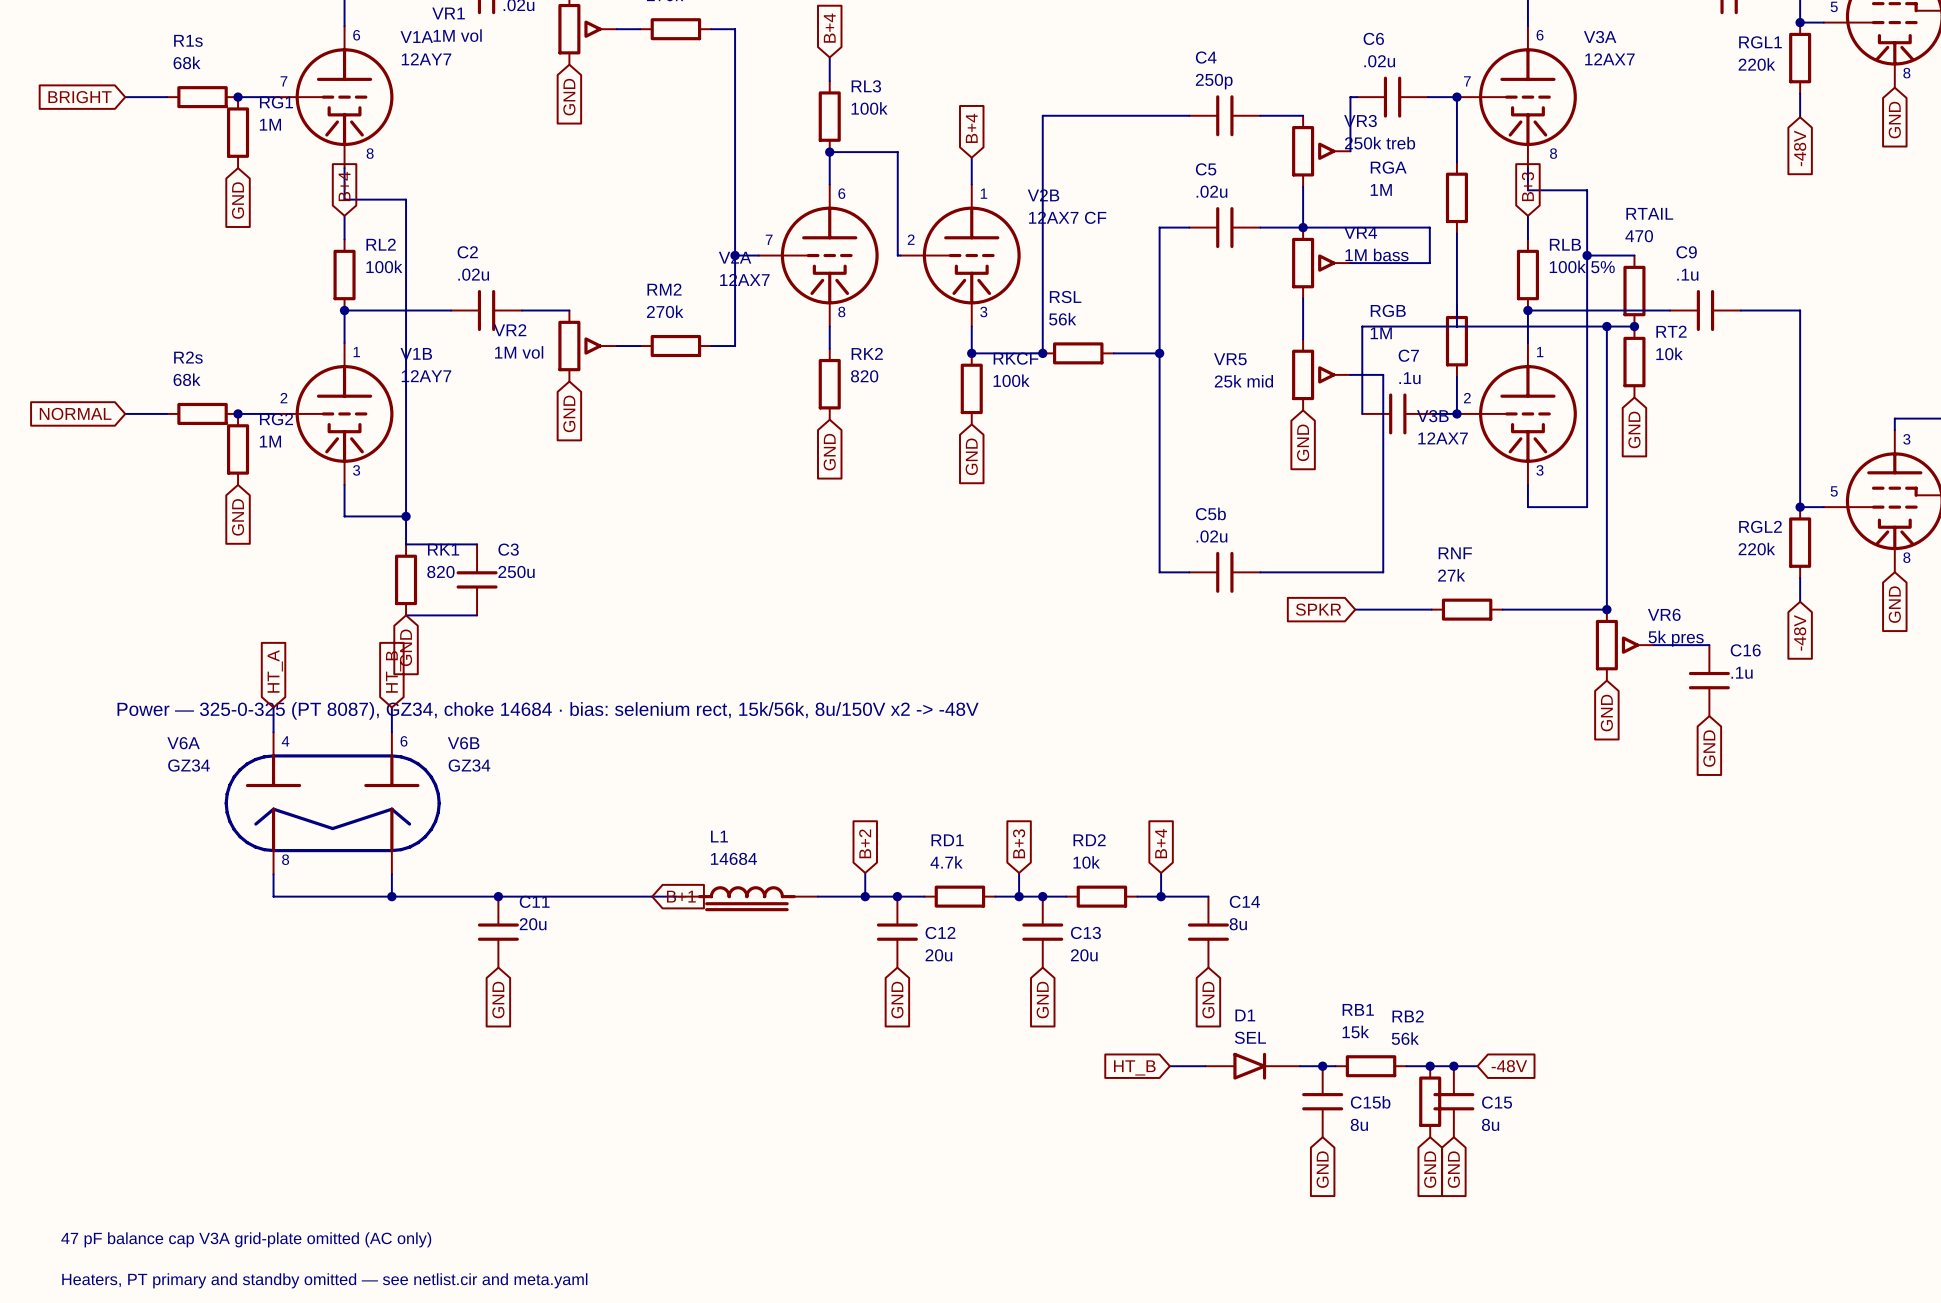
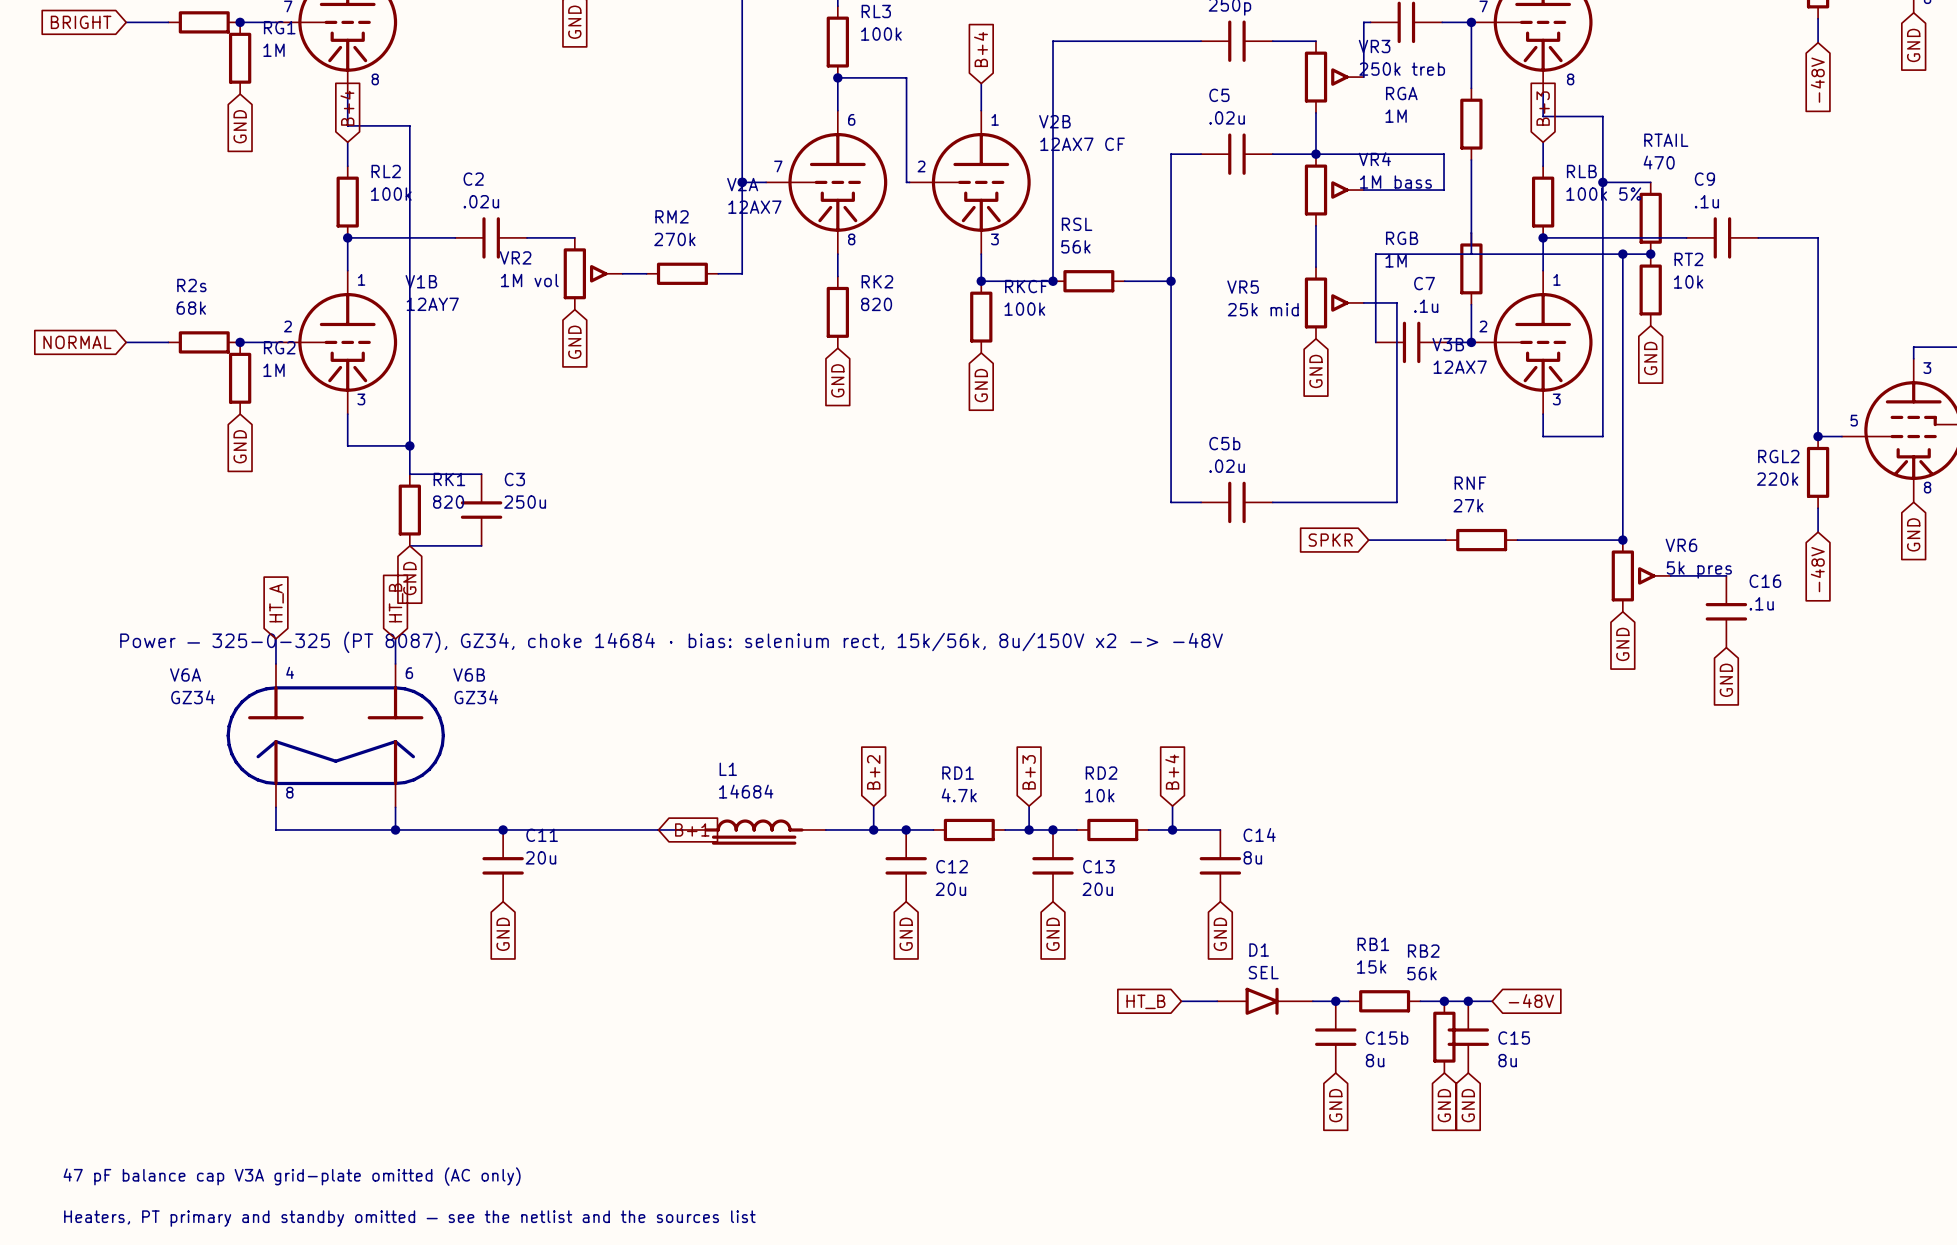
text: Heaters, PT primary and standby omitted — see netlist.cir and meta.yaml (324, 1280) -> Heaters, PT primary and standby omitted — see the netlist and the sources list (409, 1218)

